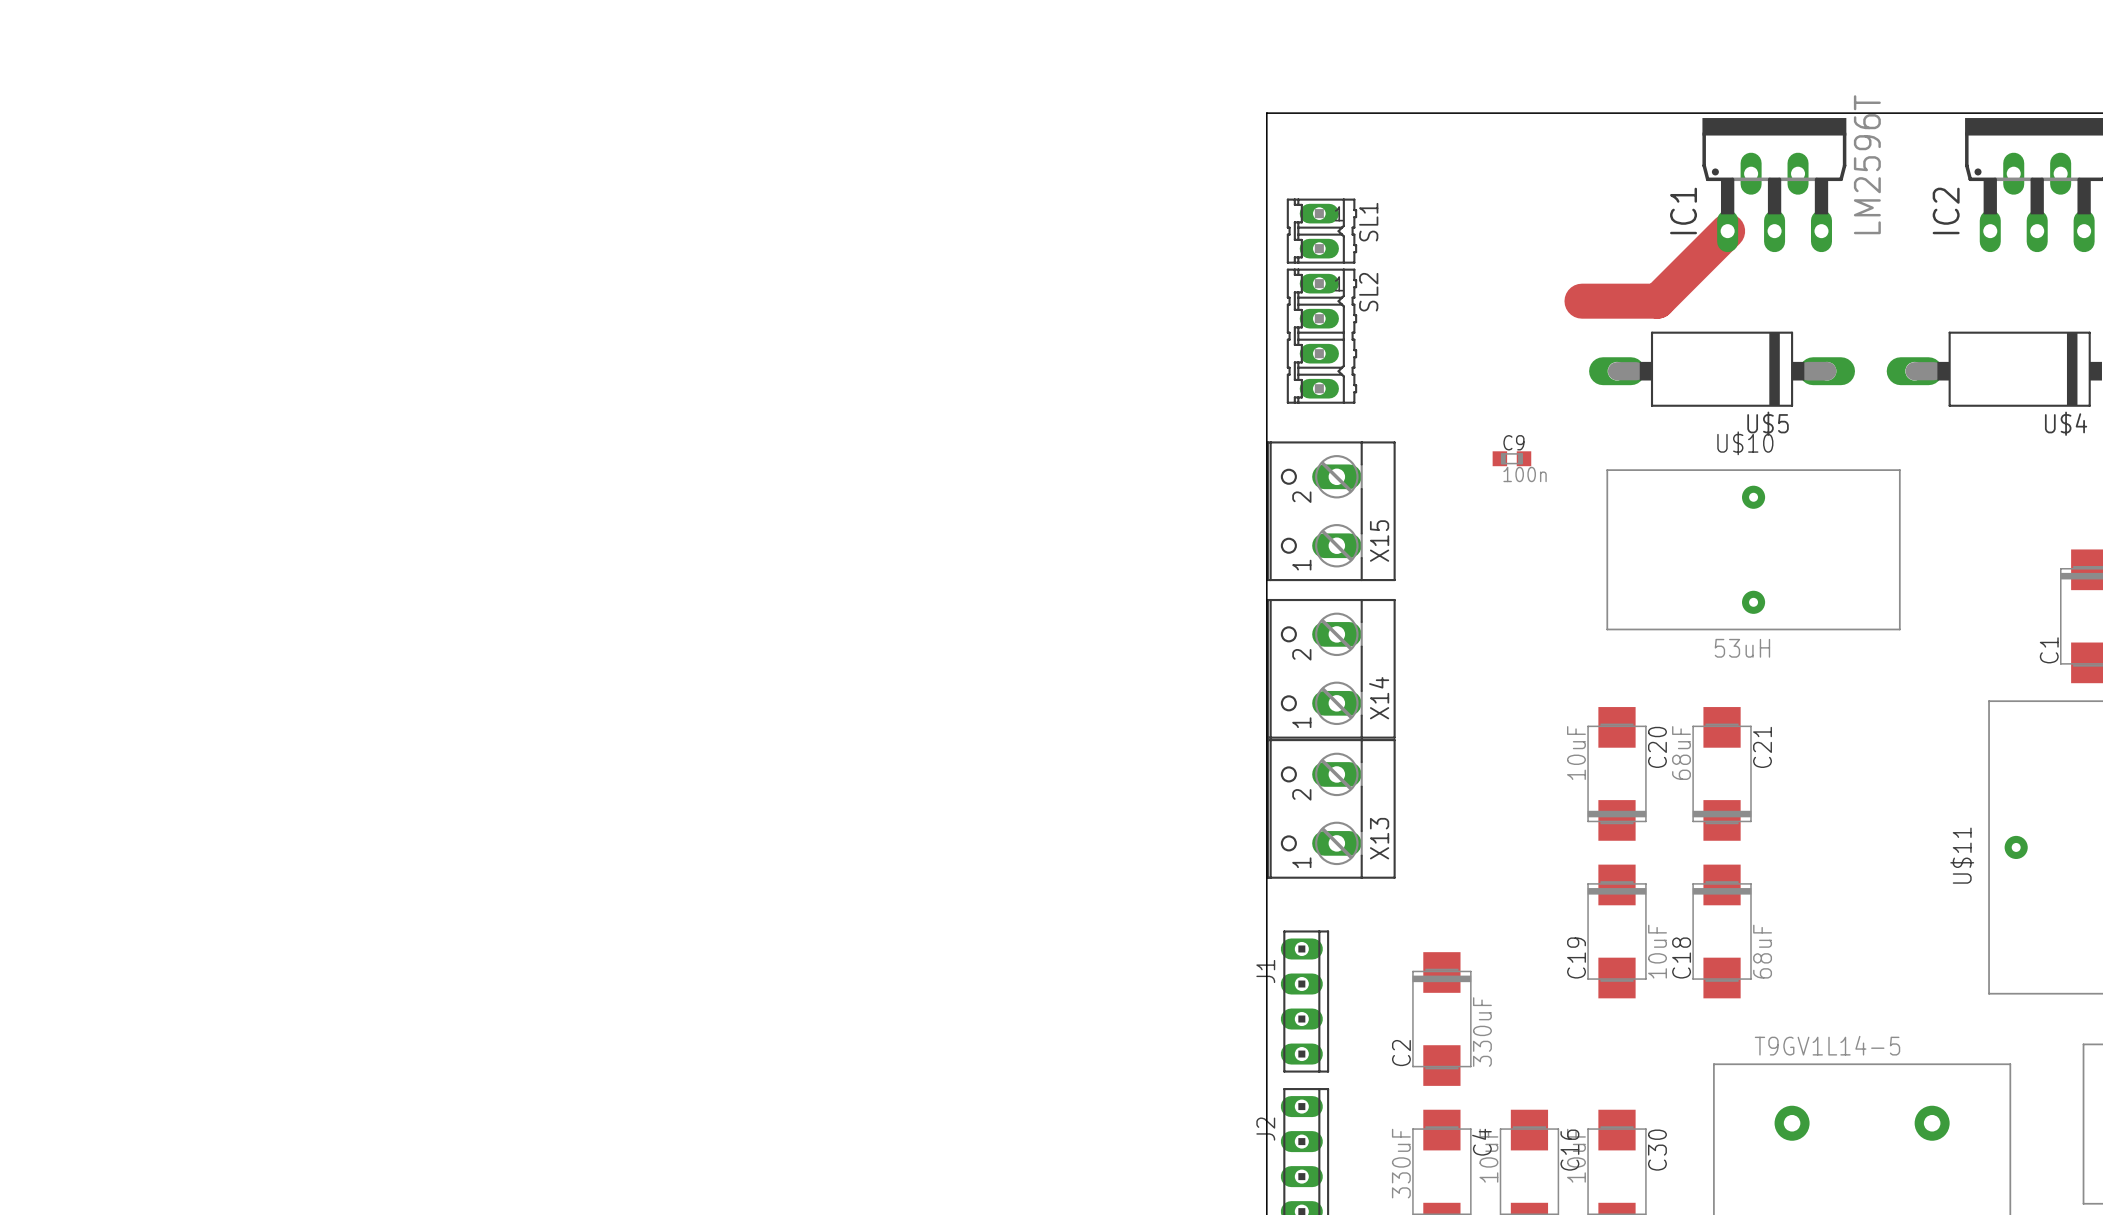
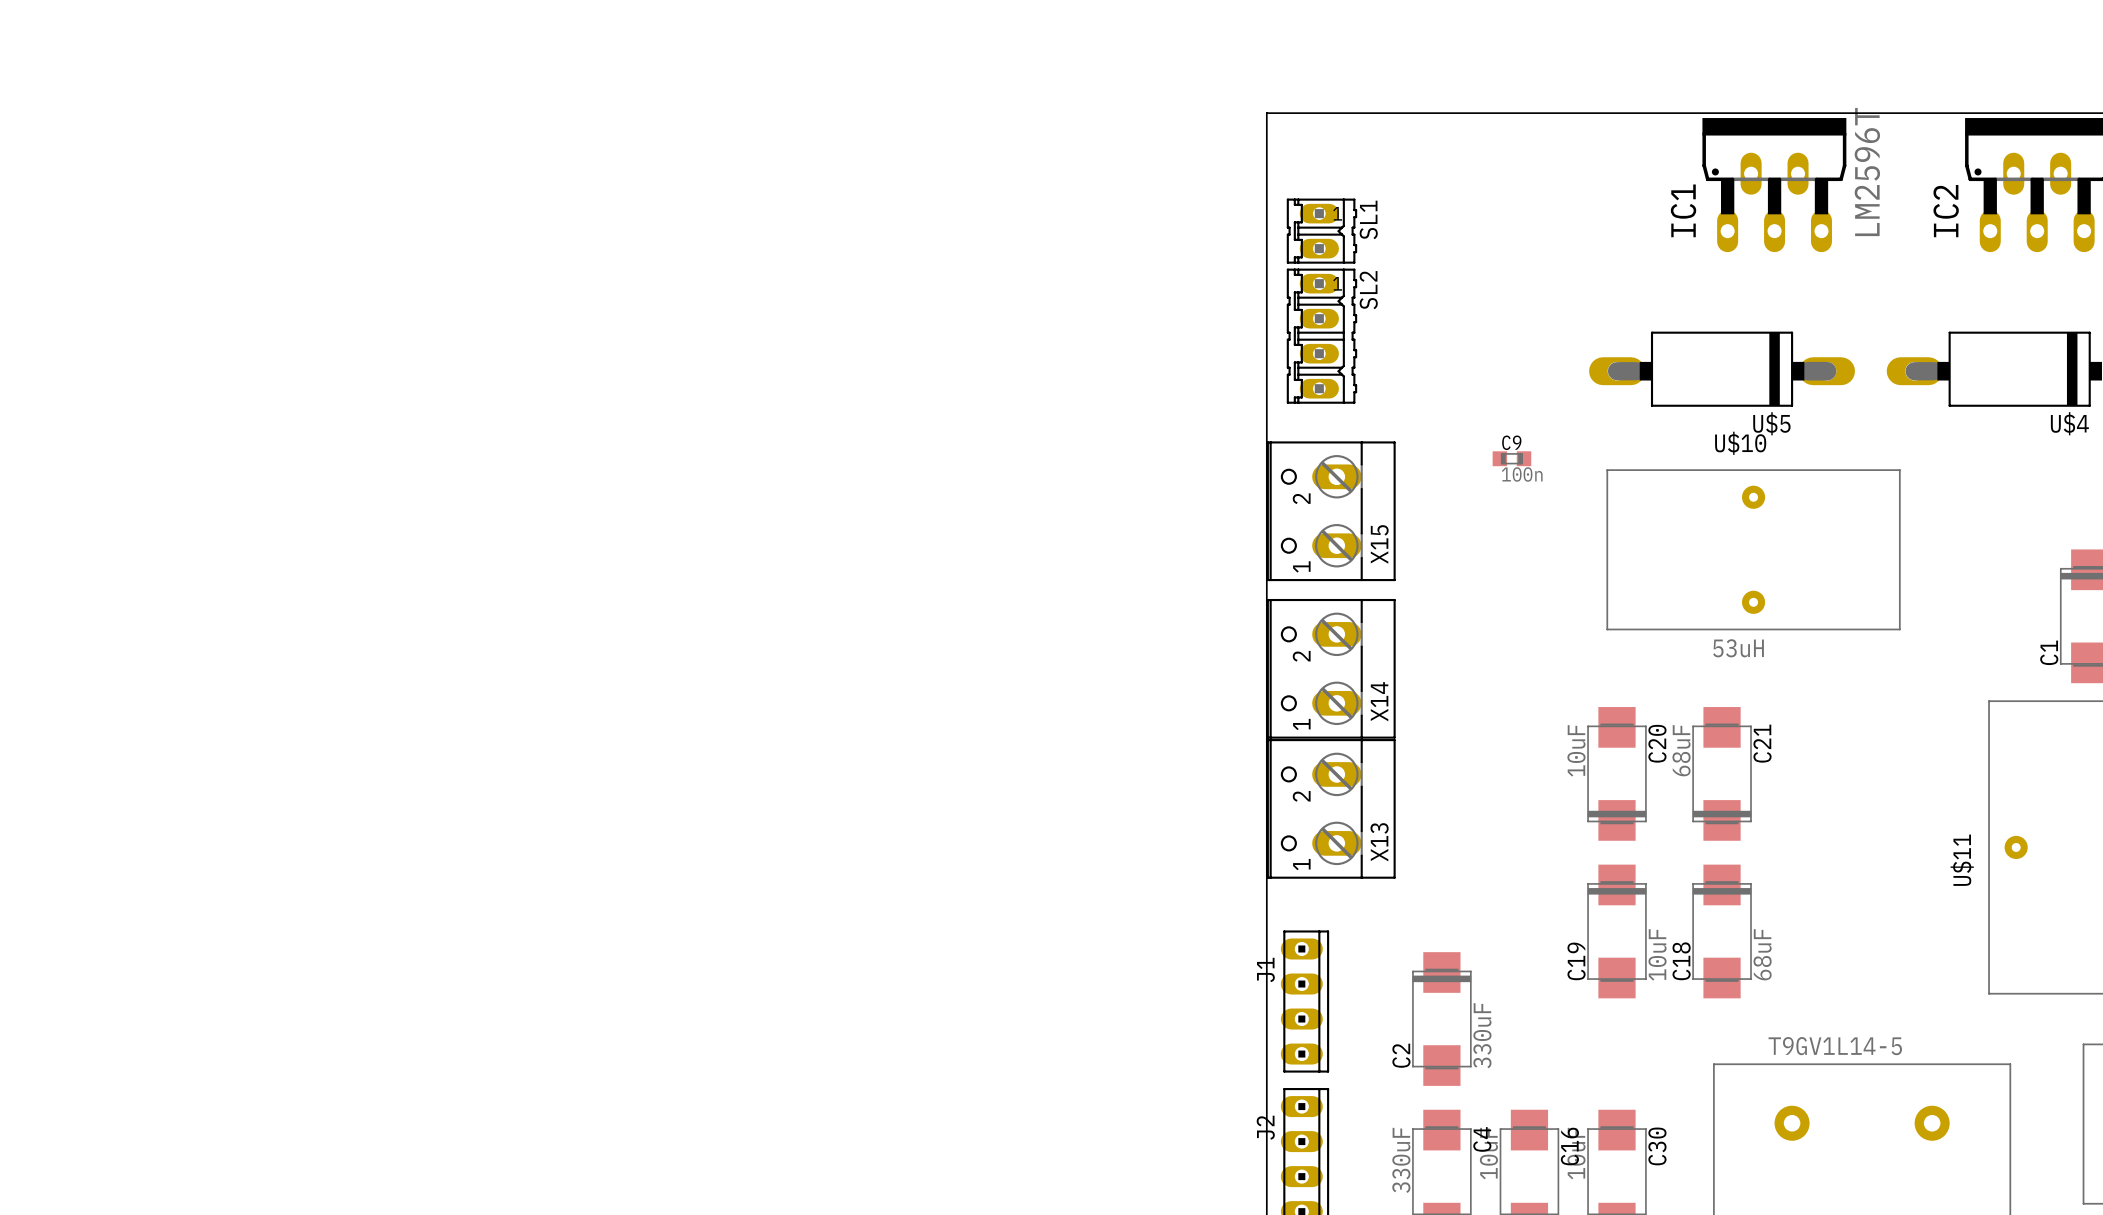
top track: (1727, 231) (1657, 301) (1581, 301) -> none

